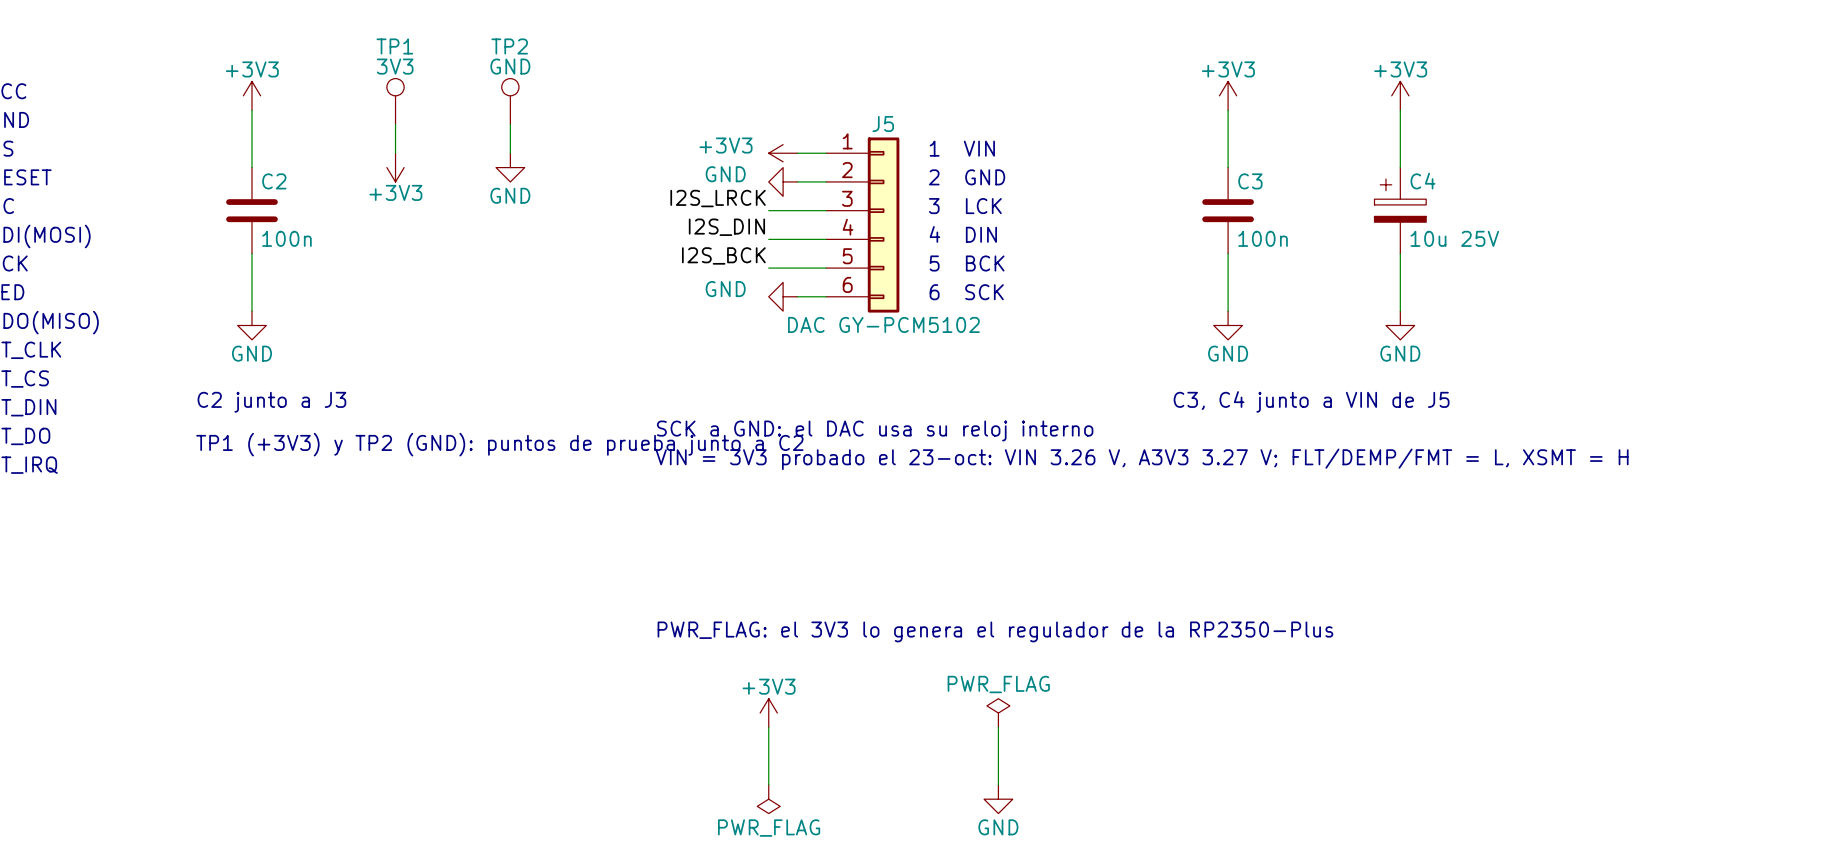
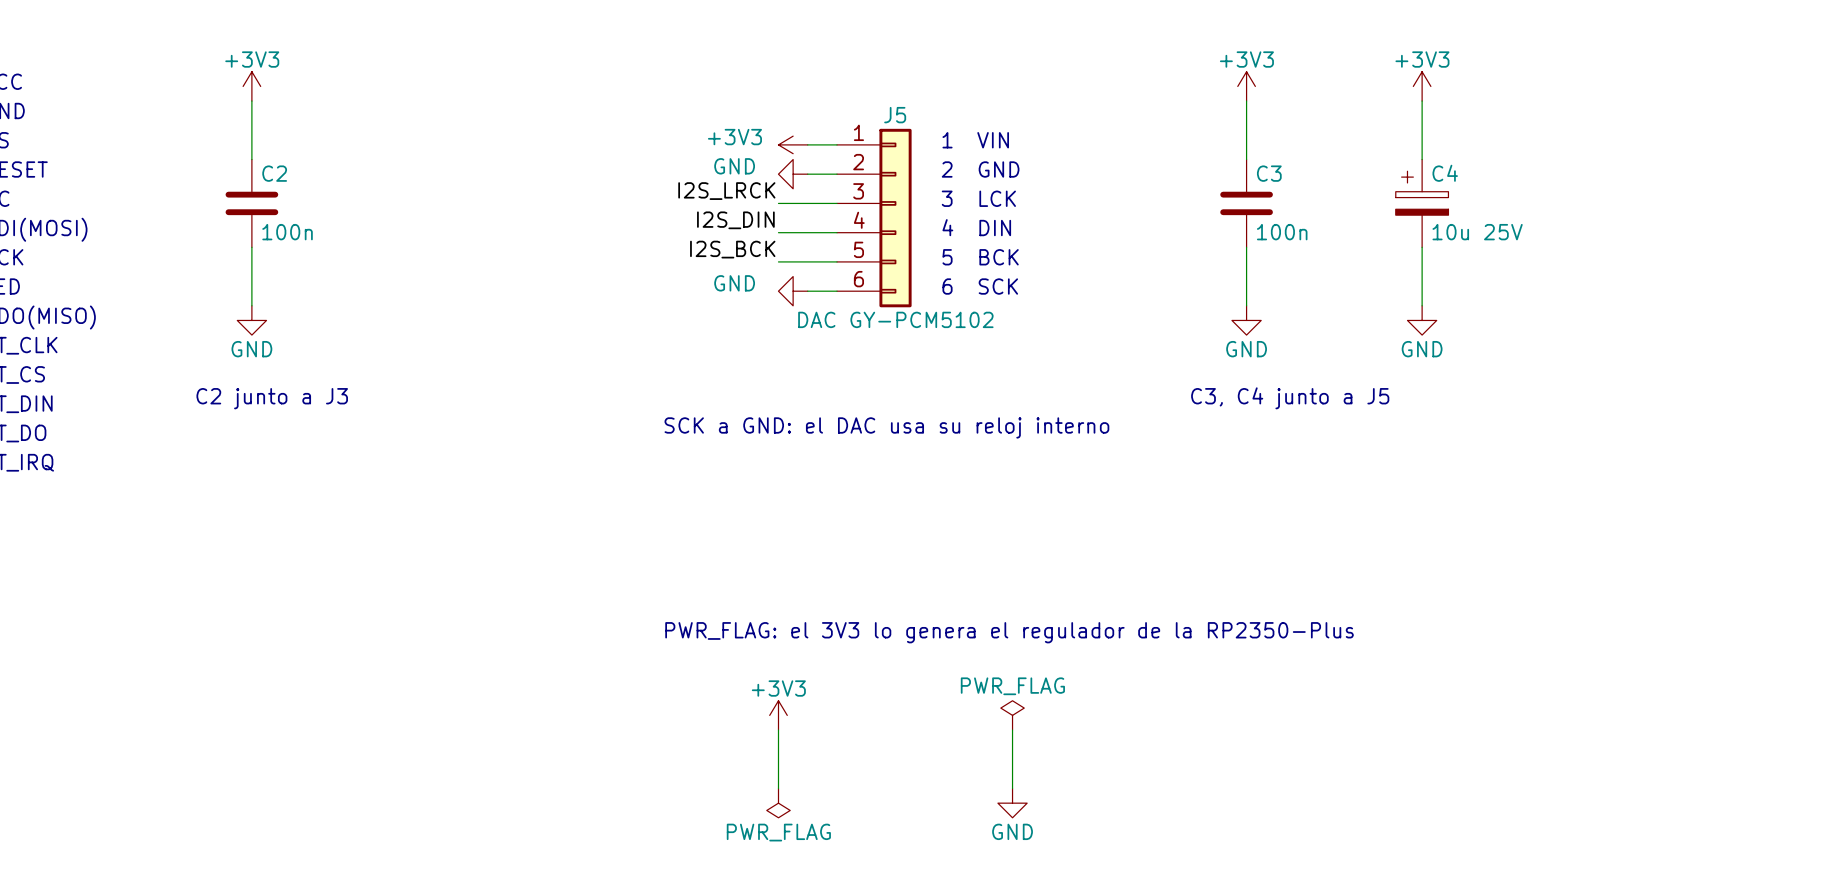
TP1: 3V3 (395, 101) -> none
TP2: GND (510, 101) -> none
wire: (395, 124) (395, 153) -> none
wire: (510, 124) (510, 153) -> none
power symbol: +3V3 (395, 167) -> none
power symbol: GND (510, 167) -> none
text: C3, C4 junto a VIN de J5 (1311, 401) -> C3, C4 junto a J5 (1290, 398)
text: TP1 (+3V3) y TP2 (GND): puntos de prueba junto a C2 (499, 444) -> none
text: VIN = 3V3 probado el 23-oct: VIN 3.26 V, A3V3 3.27 V; FLT/DEMP/FMT = L, XSMT = H (1142, 459) -> none

